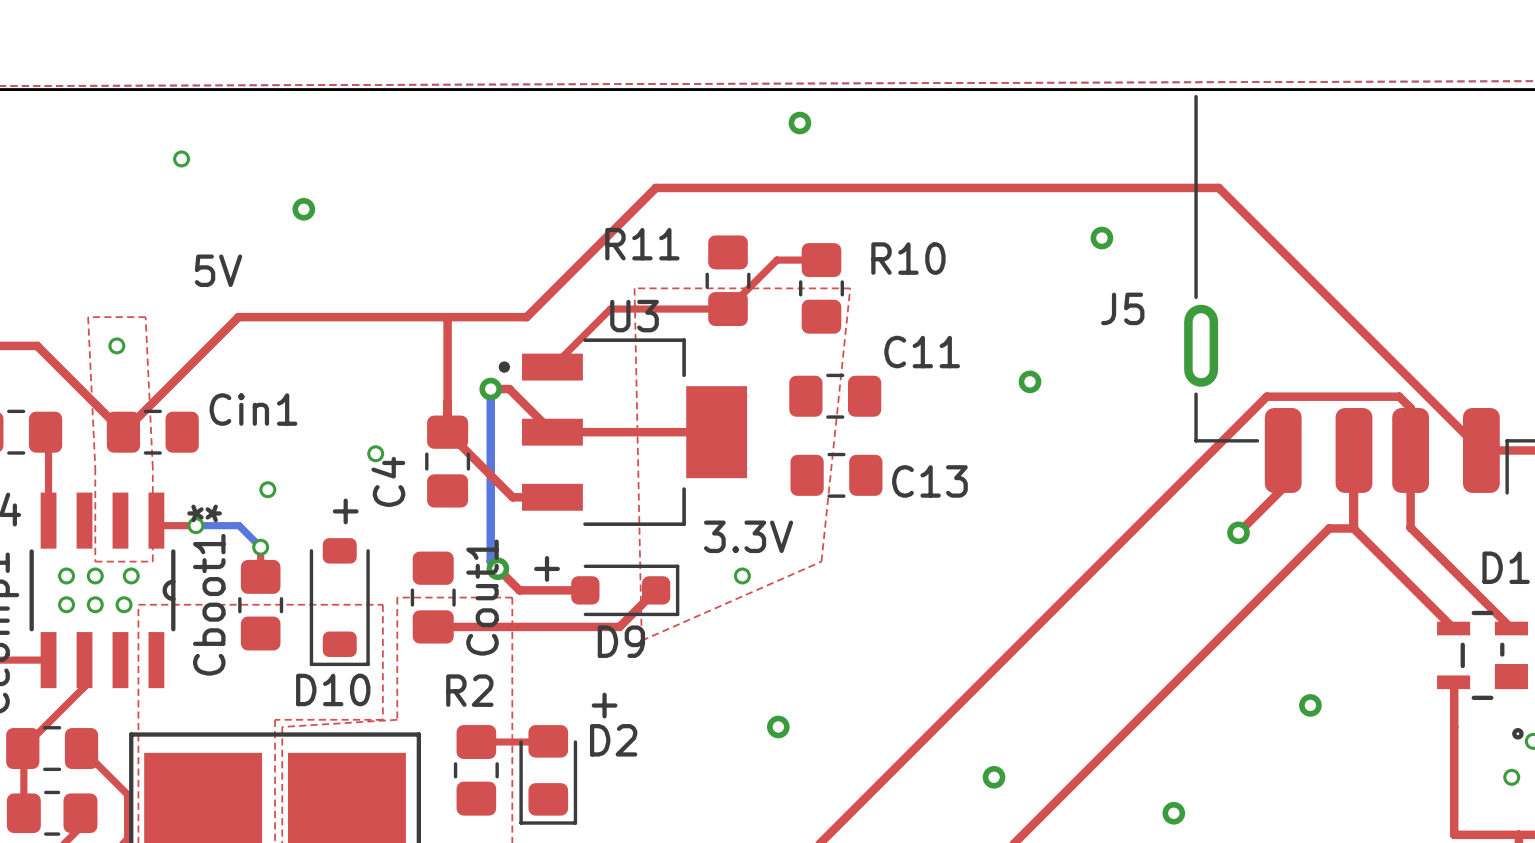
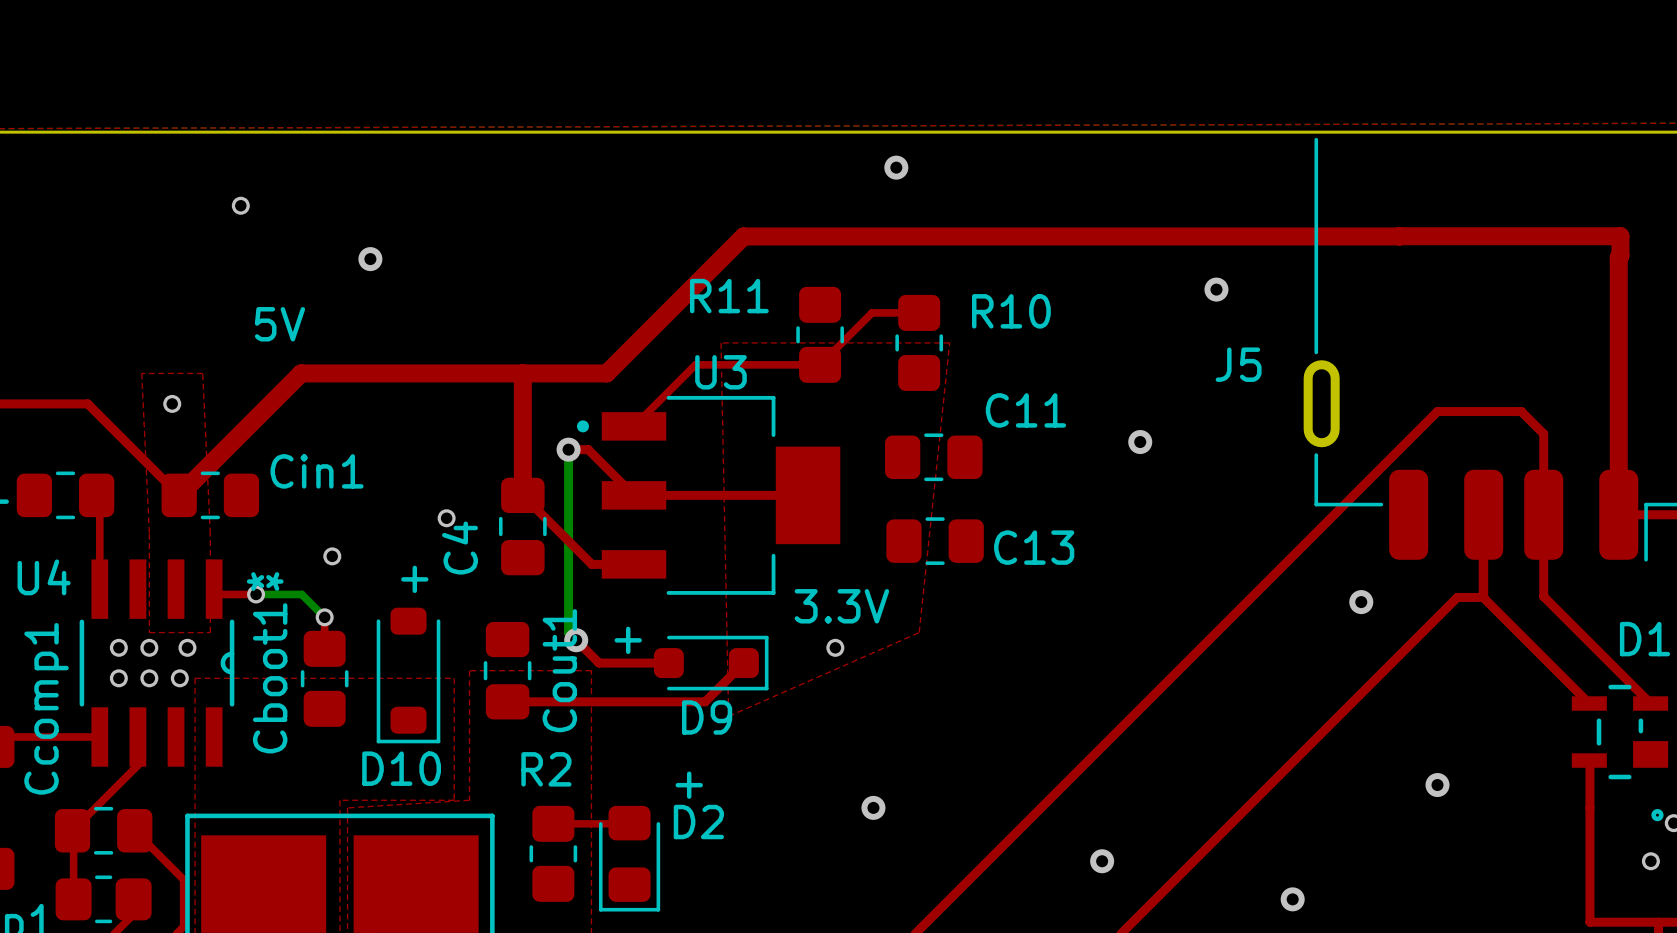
top track: (1218, 187) (1481, 450) -> (1399, 236) (1620, 236) (1620, 255) (1618, 257) (1618, 514)
top track: none -> (1340, 236) (1399, 236)
top track width: thin (1218, 187) (655, 187) (526, 317) (238, 317) (123, 432) -> thick (1340, 236) (743, 236) (606, 373) (301, 373) (179, 495)
top track width: thin (447, 317) (447, 432) -> thick (522, 373) (522, 495)
top track: (1266, 396) (1399, 396) (1410, 408) -> (1391, 457) (1437, 411) (1521, 411) (1543, 433) (1543, 469)
top track: (1283, 488) (1238, 532) -> none

